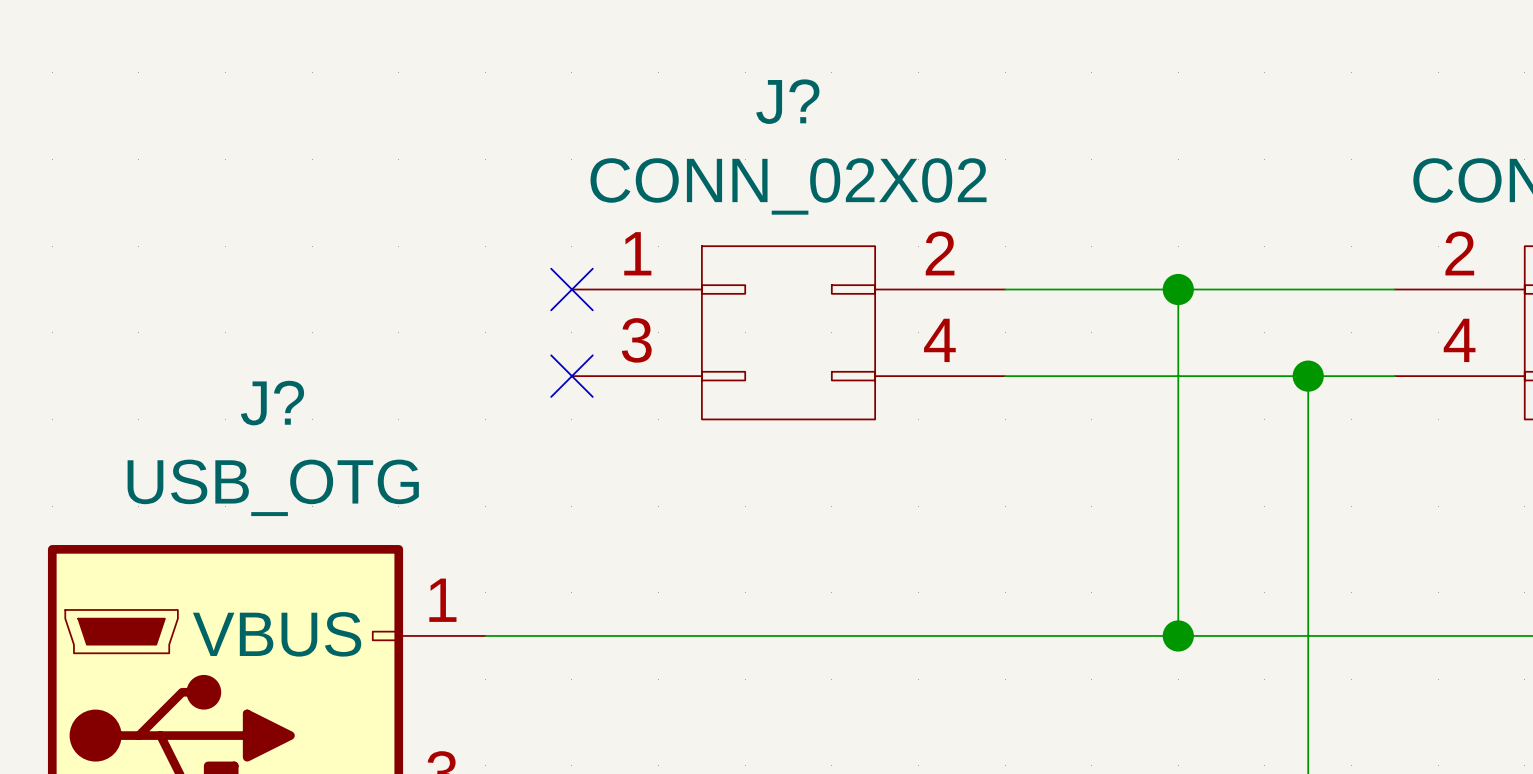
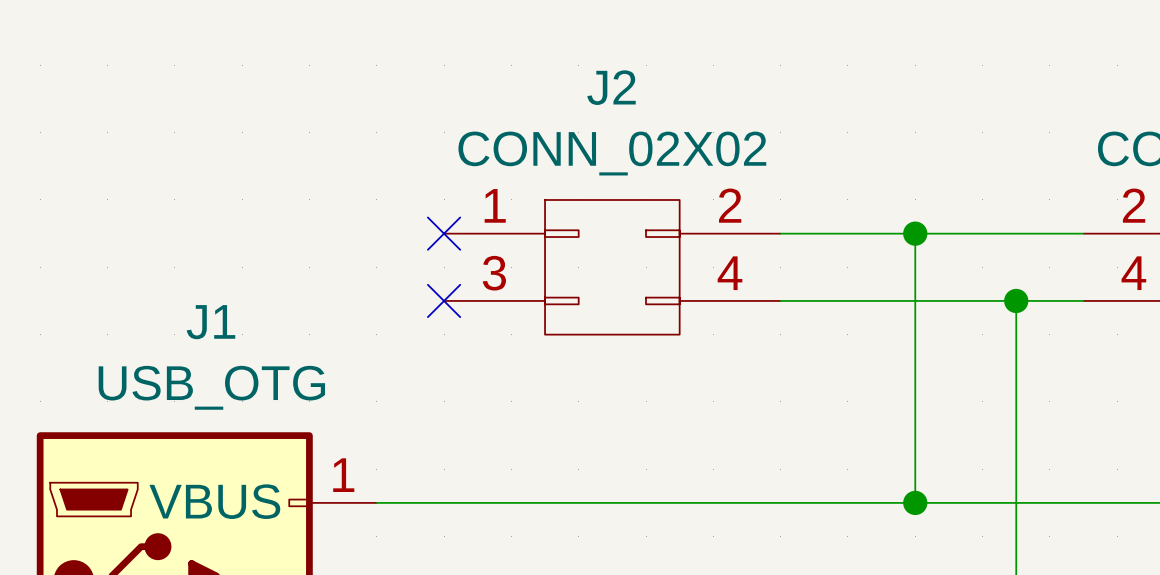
J? name: J? (787, 101) -> J2 (611, 87)
J? name: J? (272, 403) -> J1 (210, 322)

